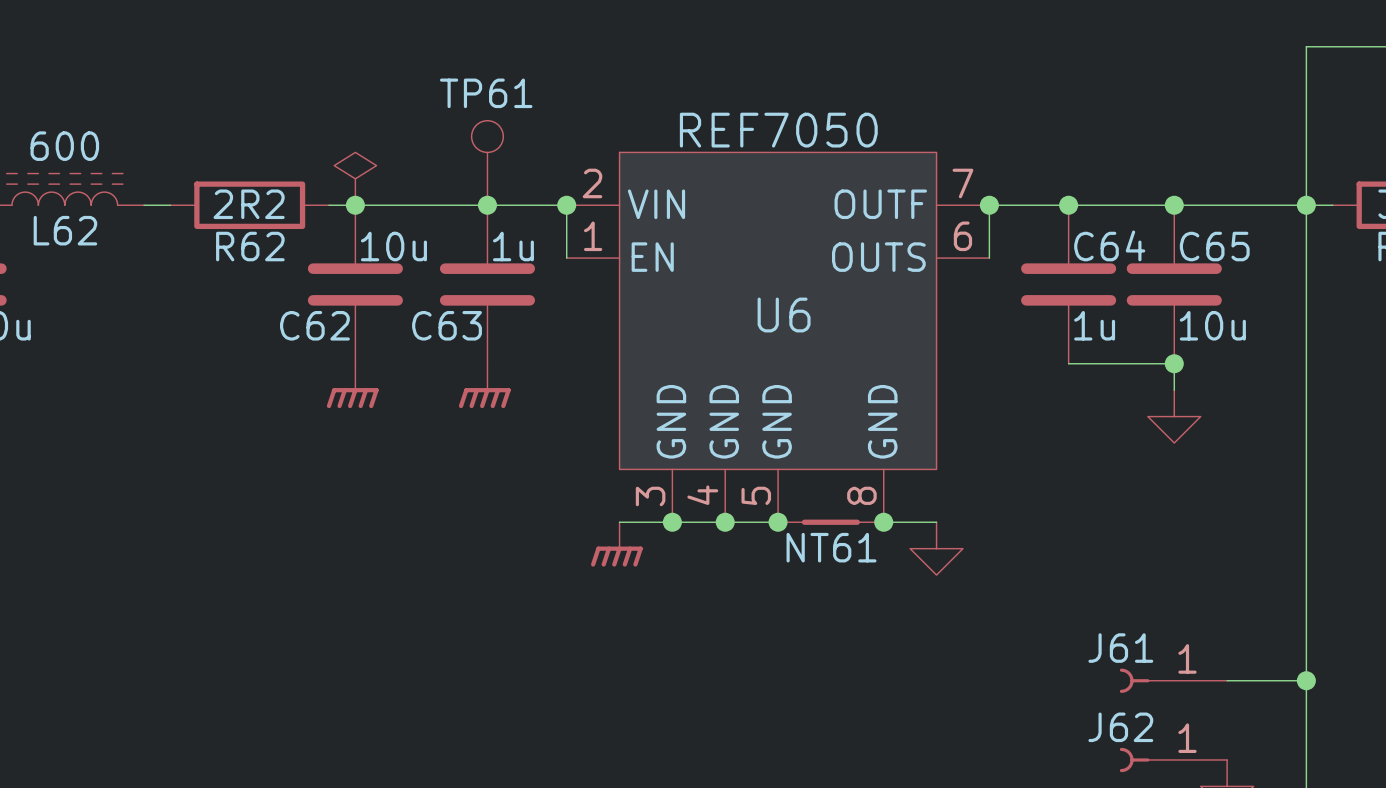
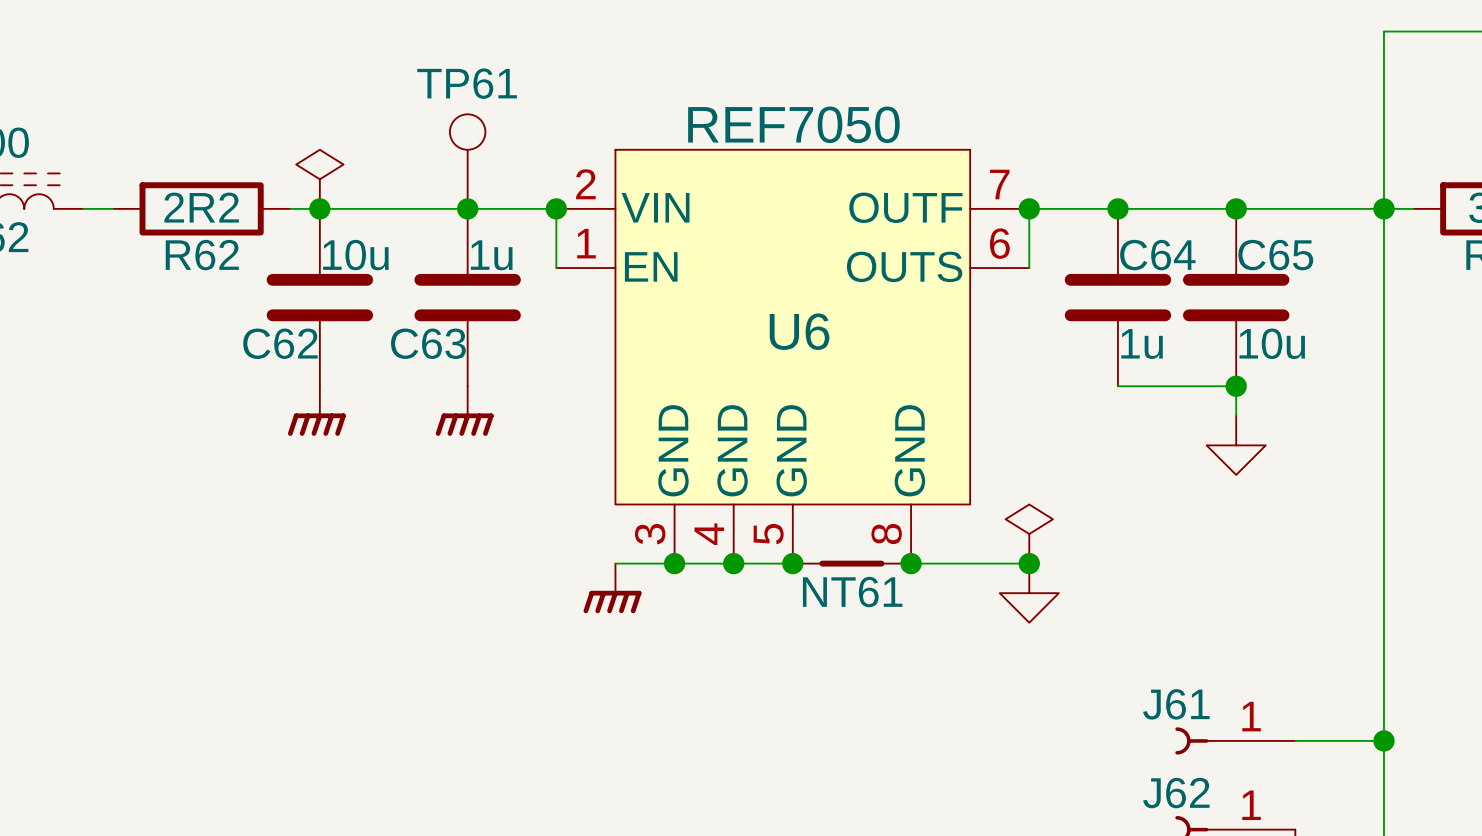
power symbol: none -> (1029, 534)
wire: none -> (970, 563) (1029, 563)
junction: none -> (1029, 563)
power symbol position: (936, 548) -> (1029, 593)

